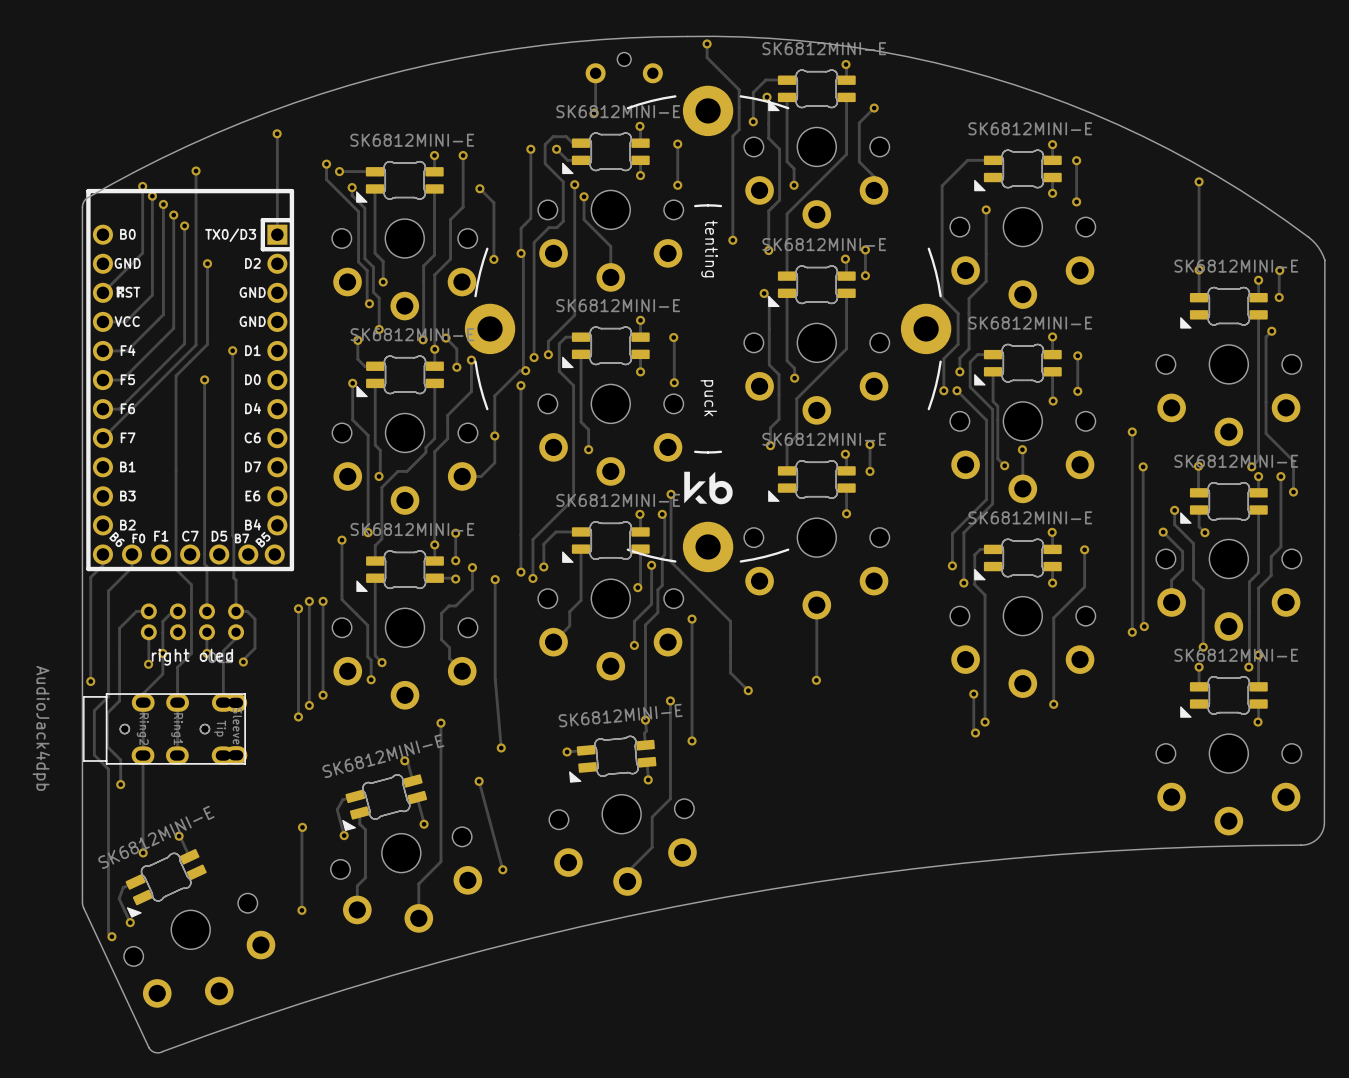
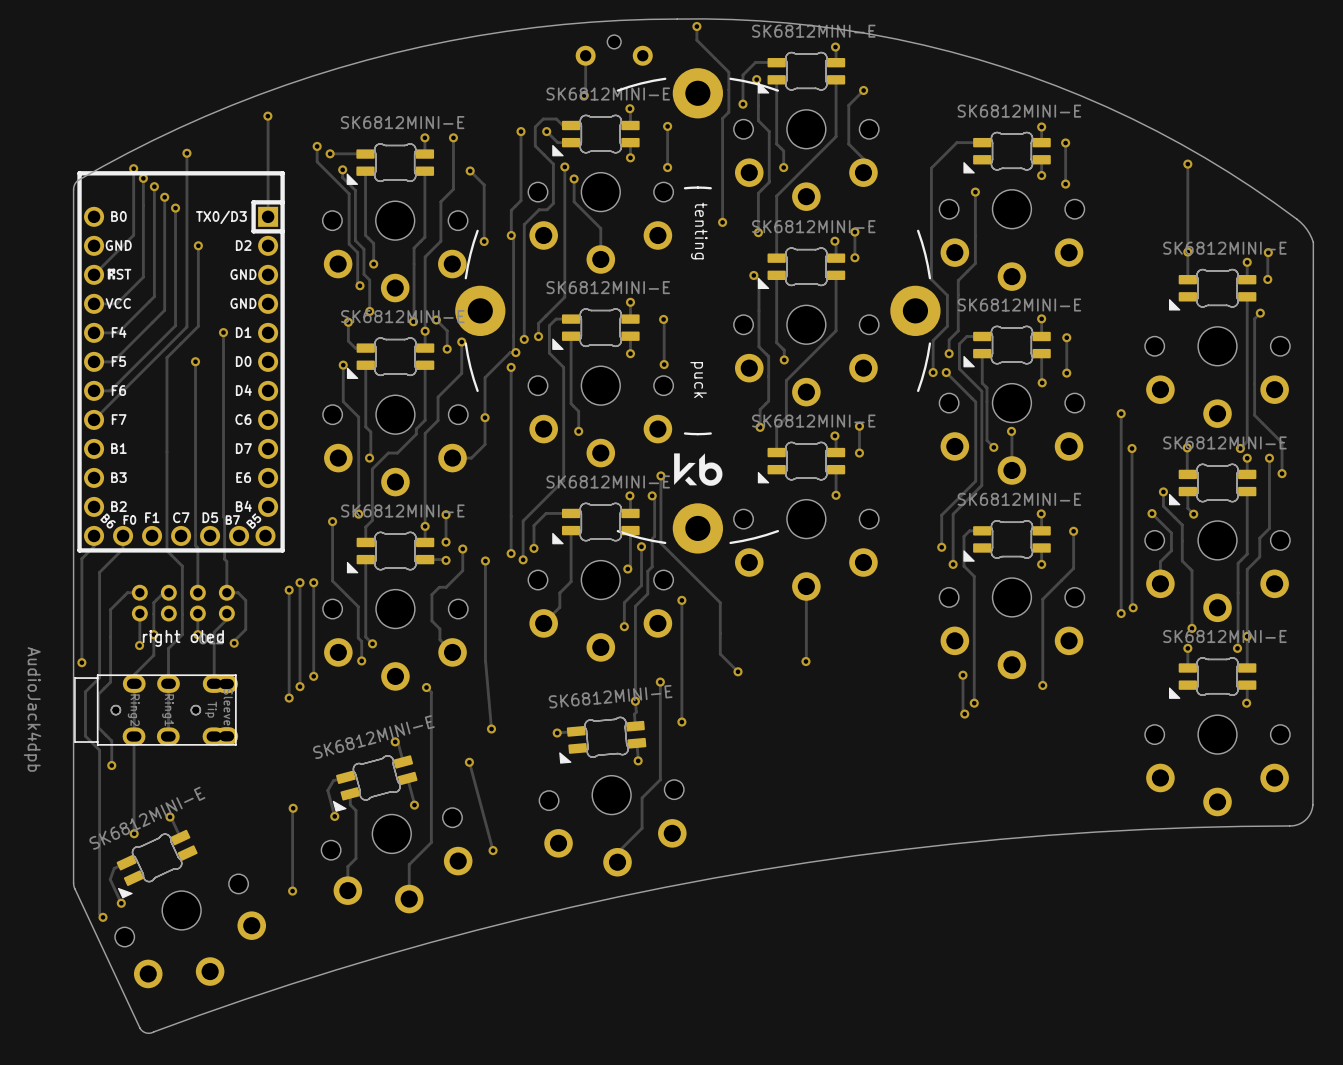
track: none -> (426, 687) (431, 692) (431, 704)
via position: (440, 723) -> (426, 687)

